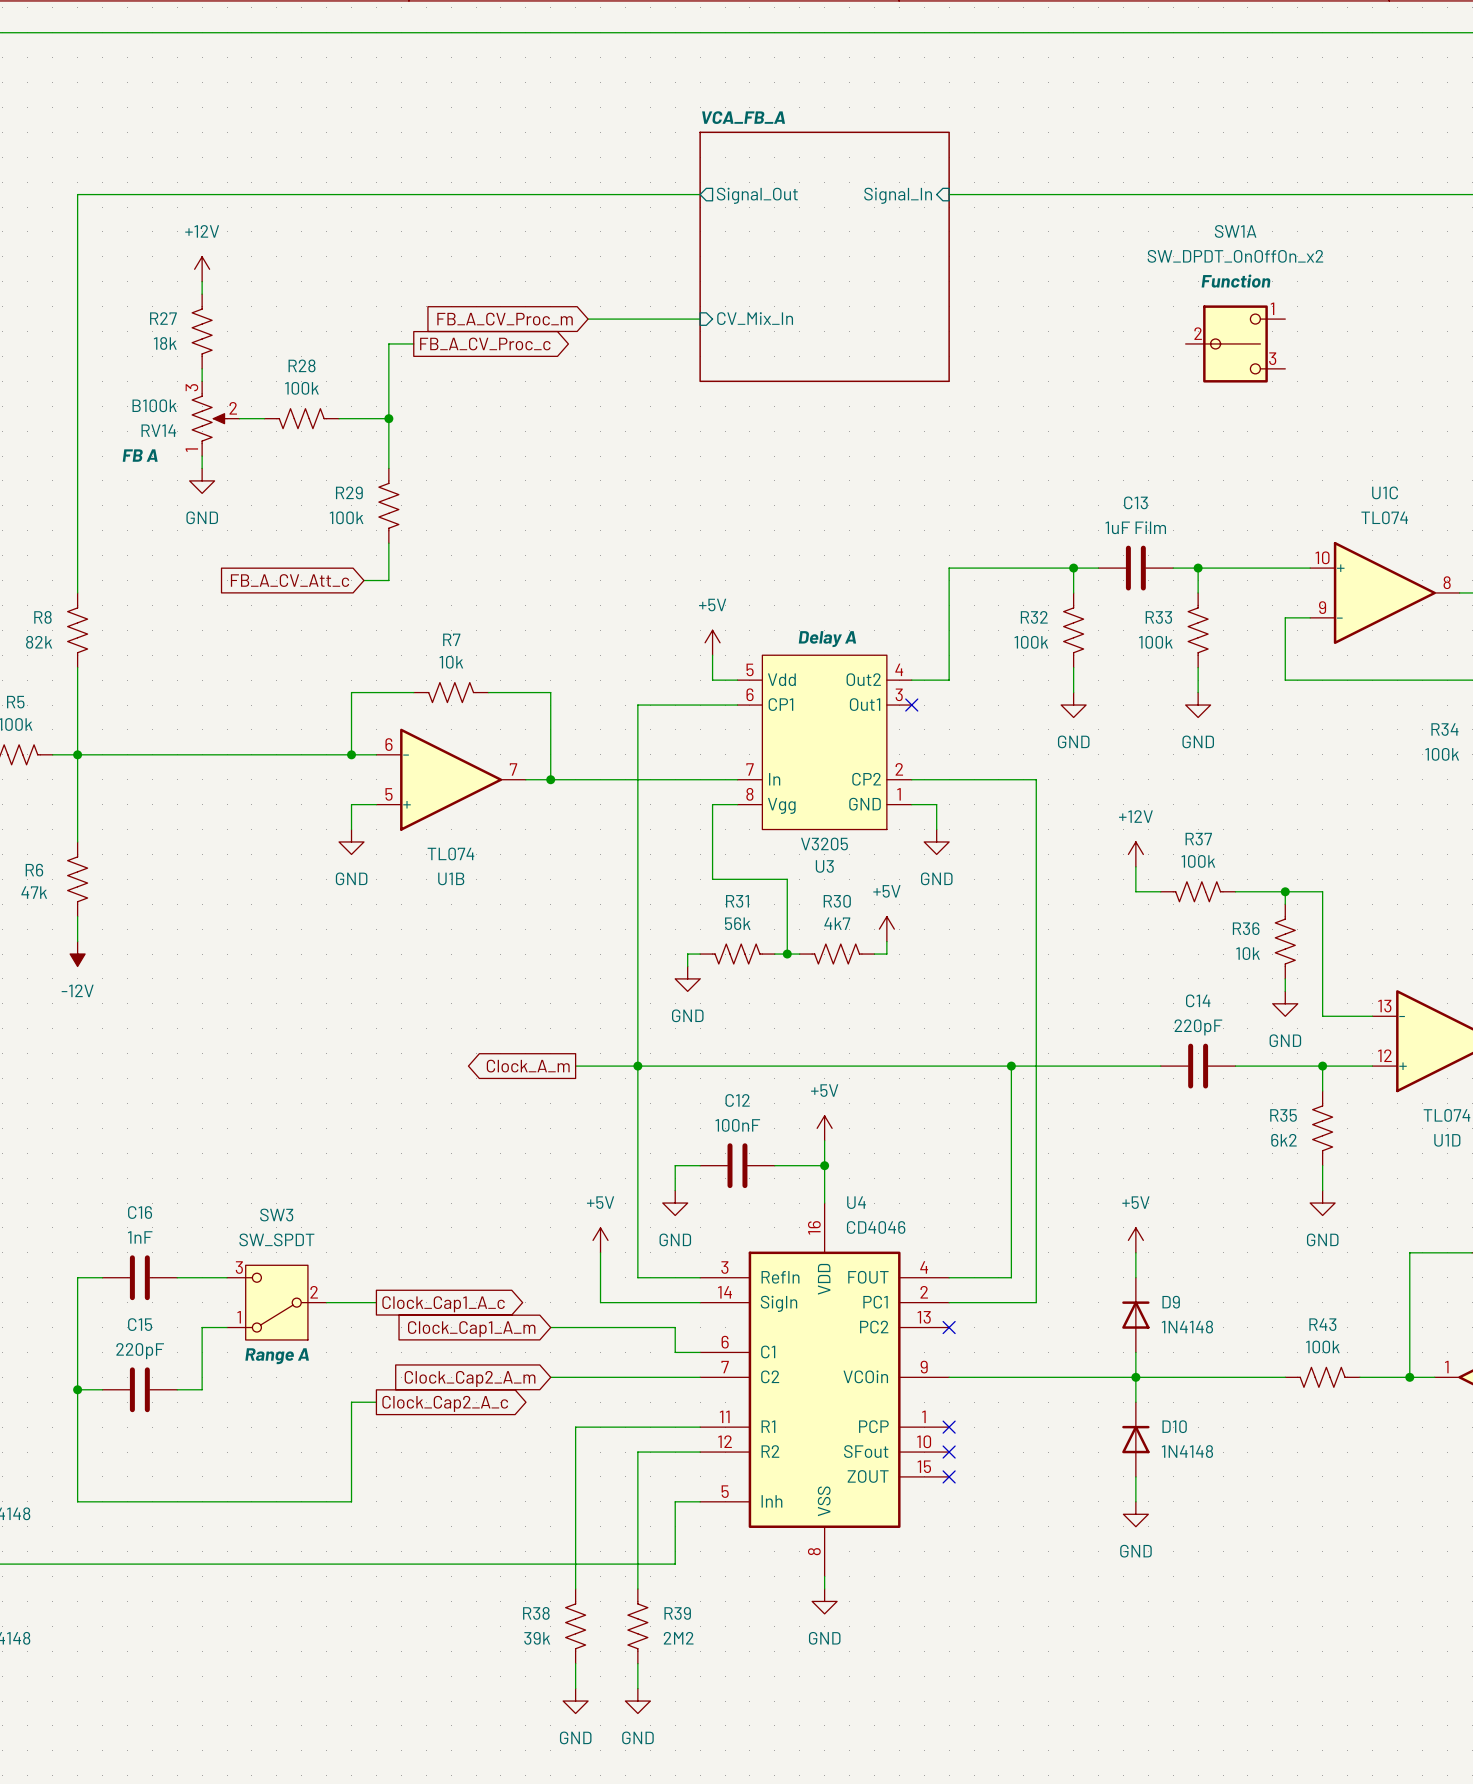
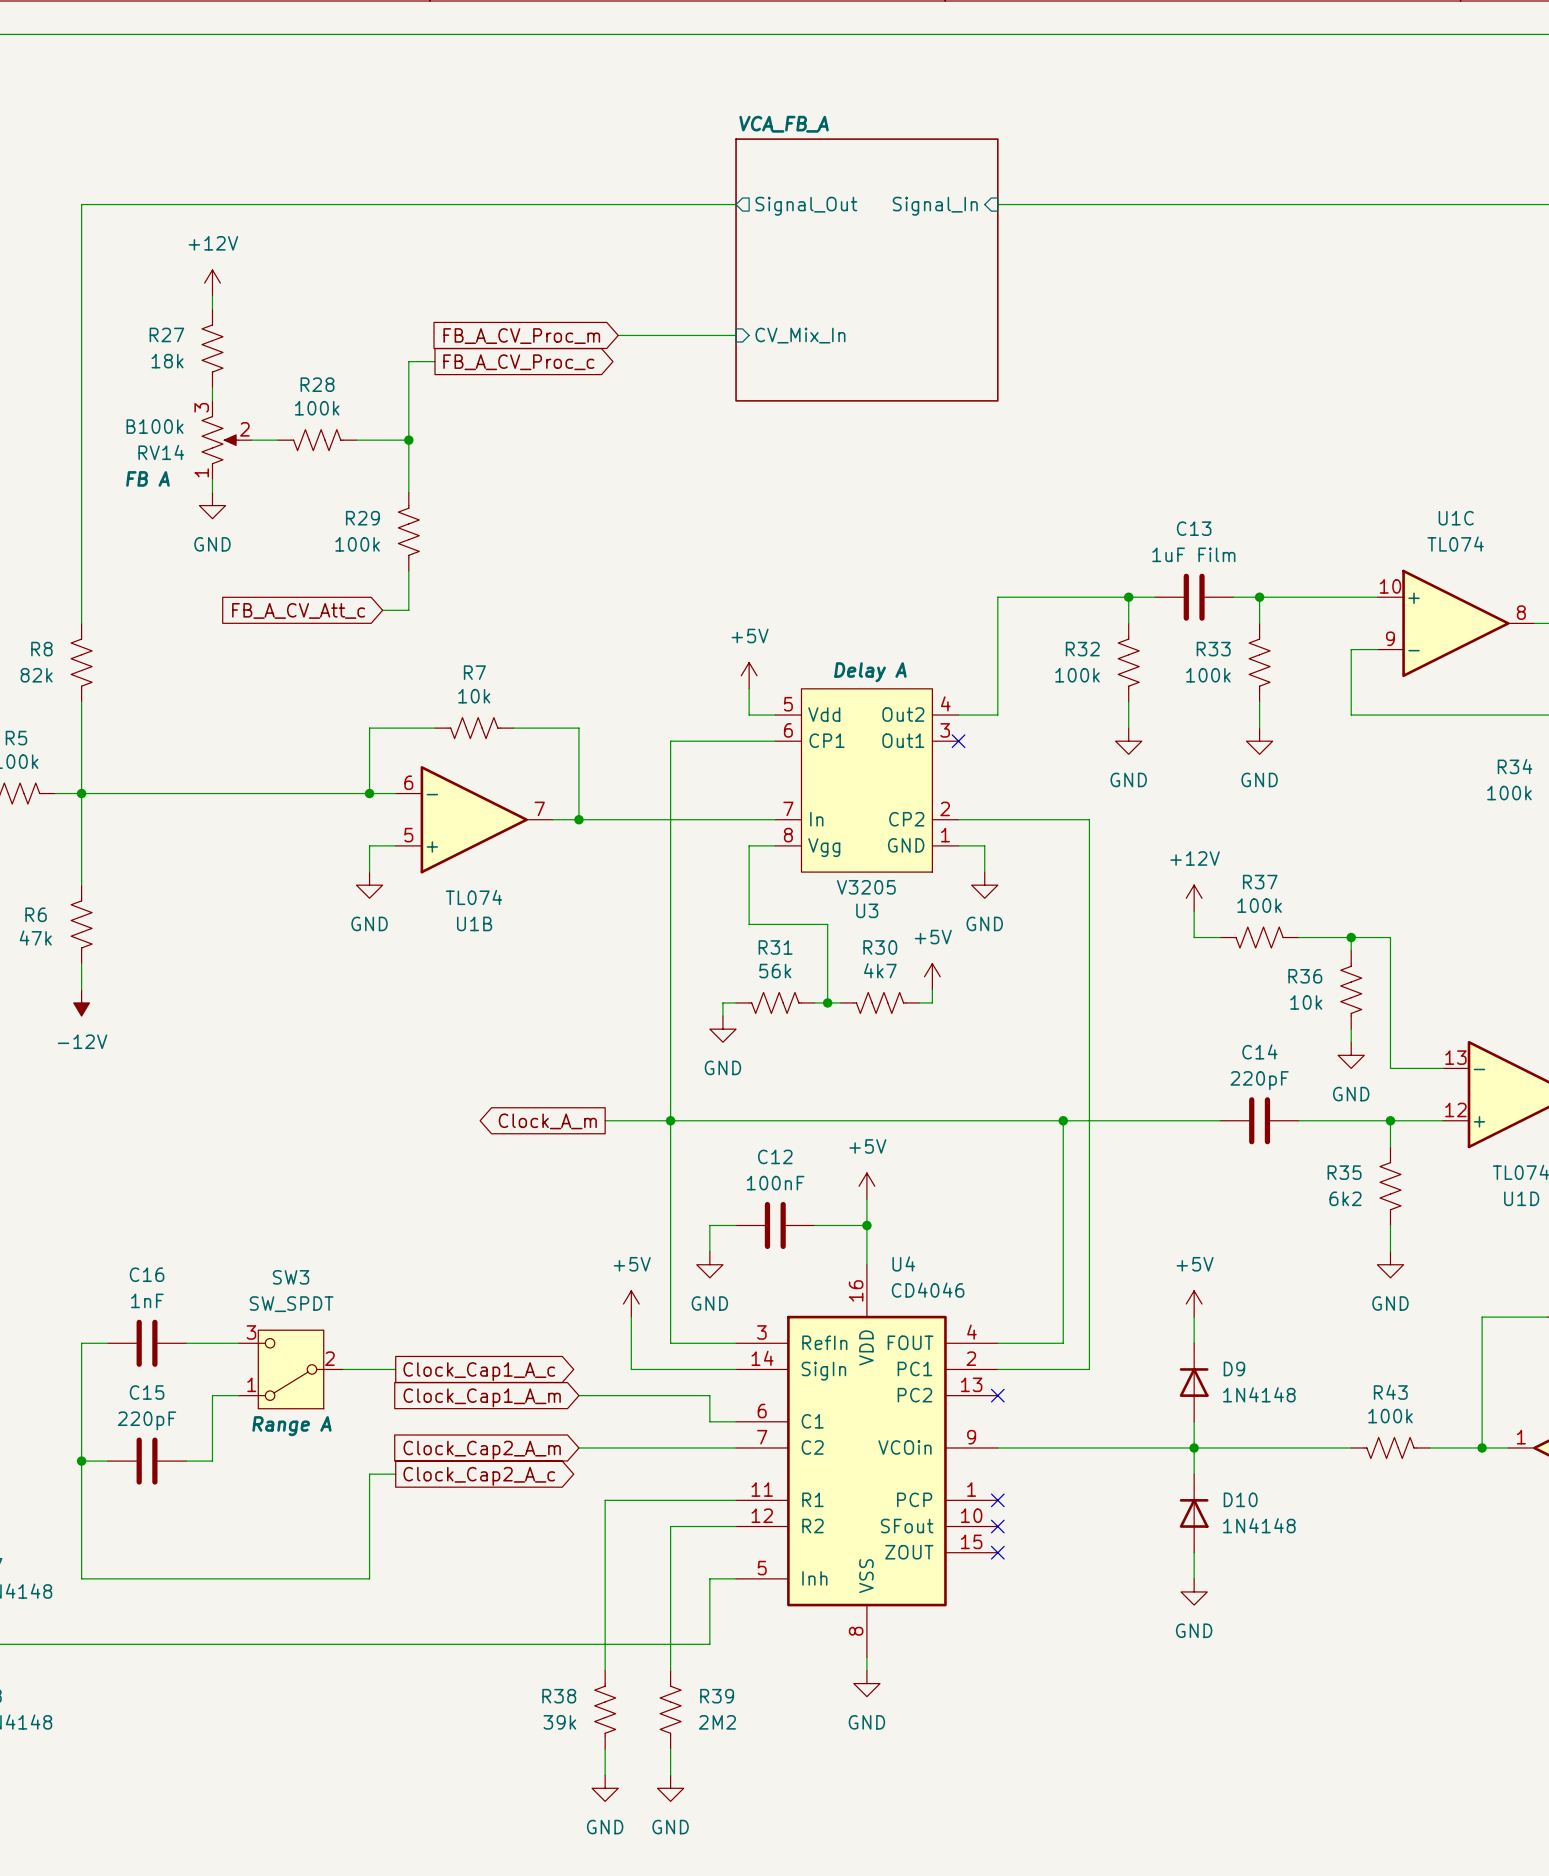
SW1A: SW_DPDT_OnOffOn_x2 (1235, 343) -> none

